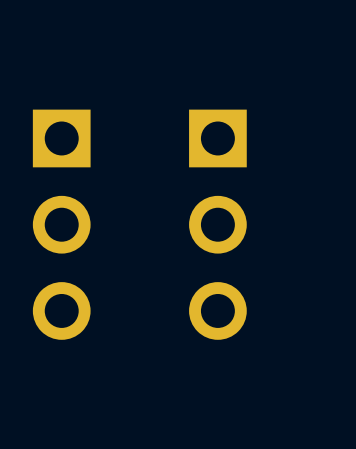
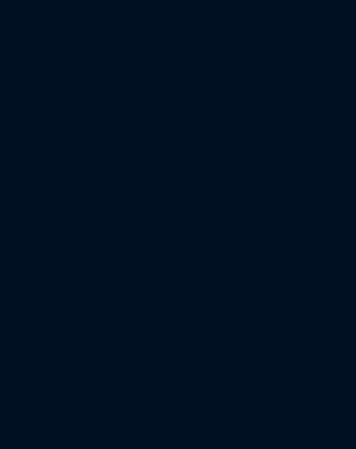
part: (61, 224) -> none
part: (217, 224) -> none

